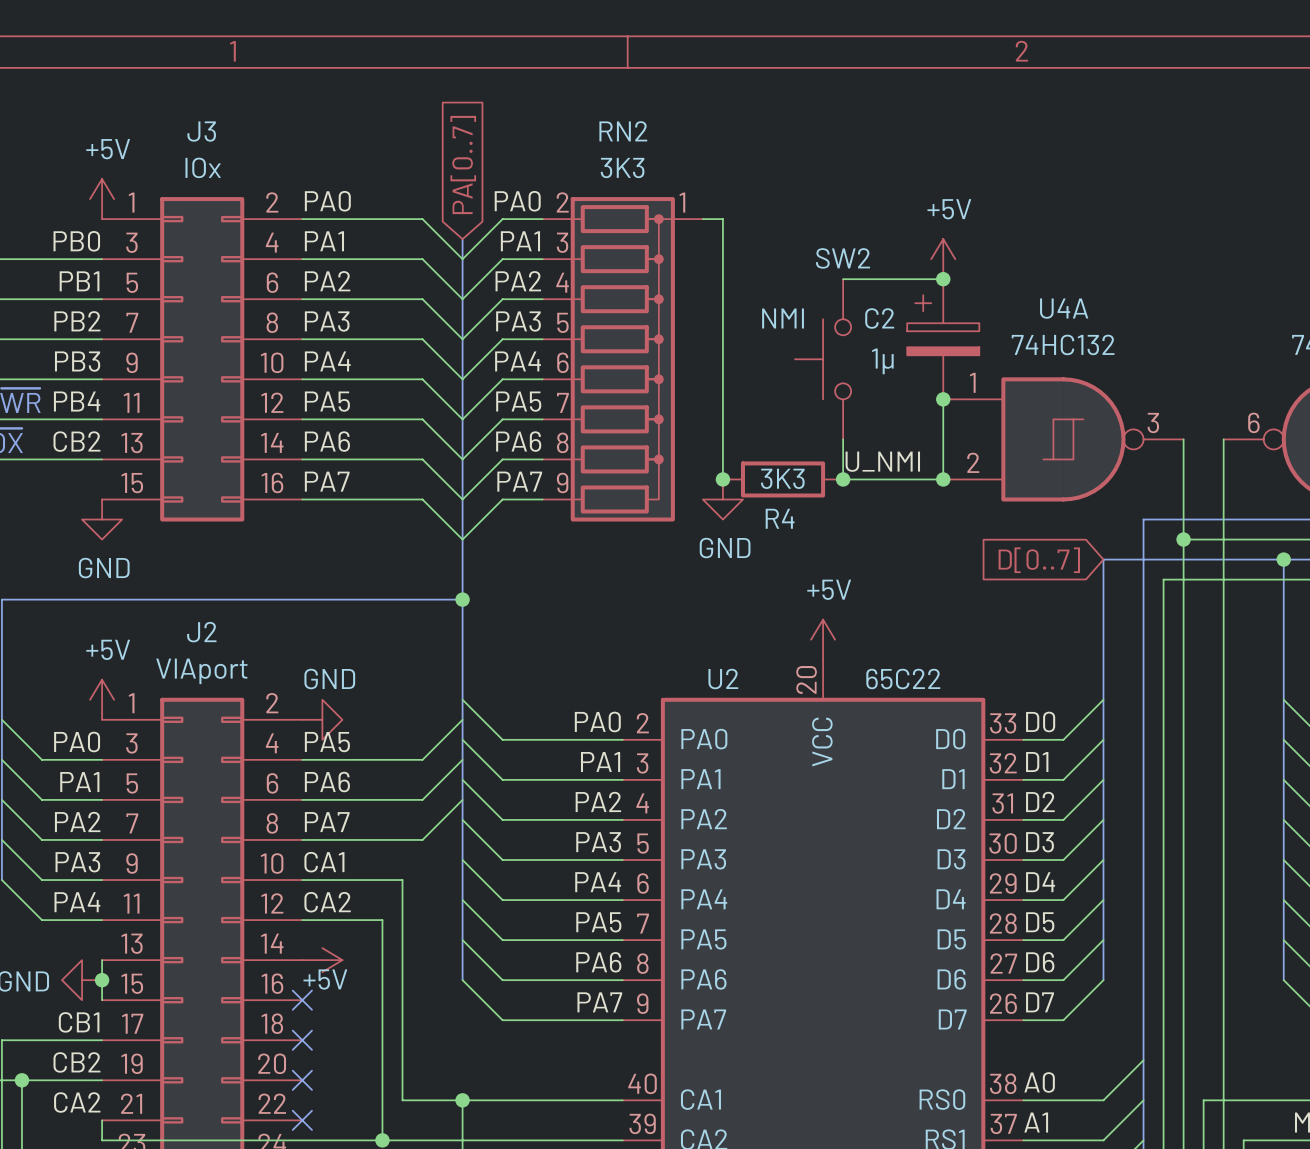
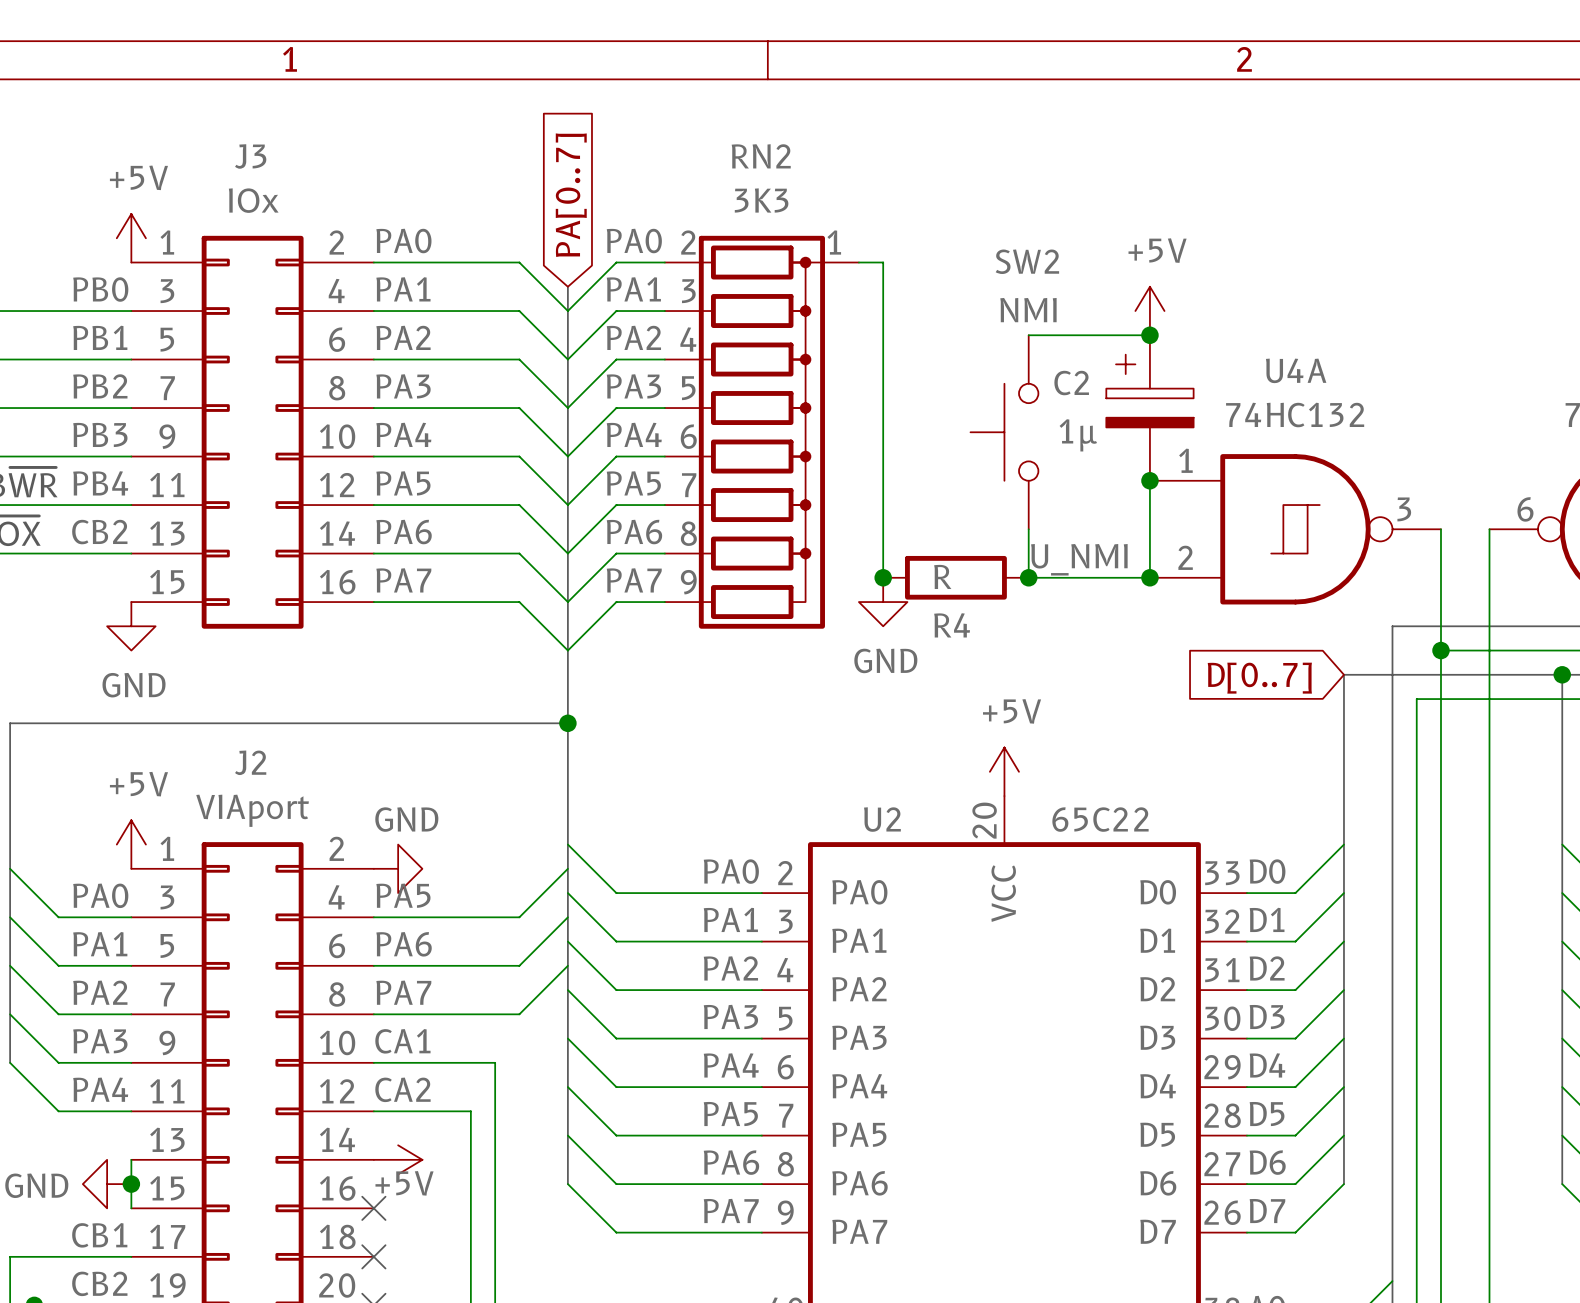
SW2 name position: SW2 (843, 258) -> SW2 (1027, 261)
SW2 value position: NMI (783, 318) -> NMI (1028, 310)
R4 value: 3K3 (782, 478) -> R (942, 576)

